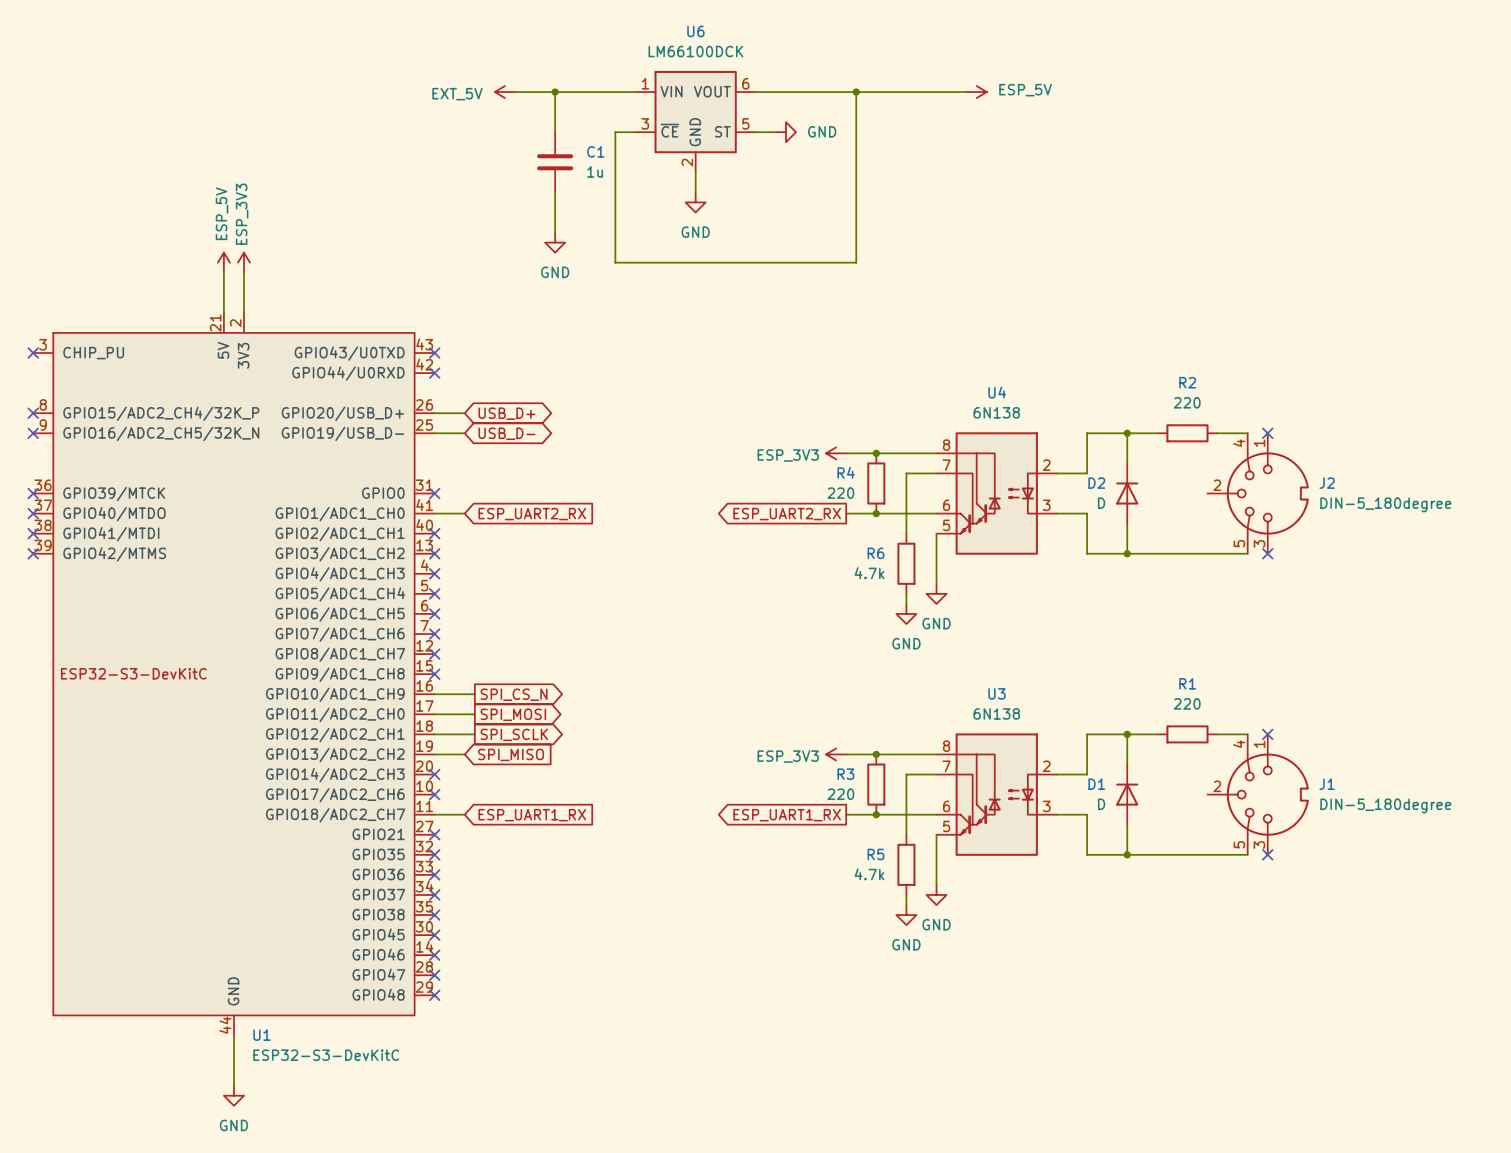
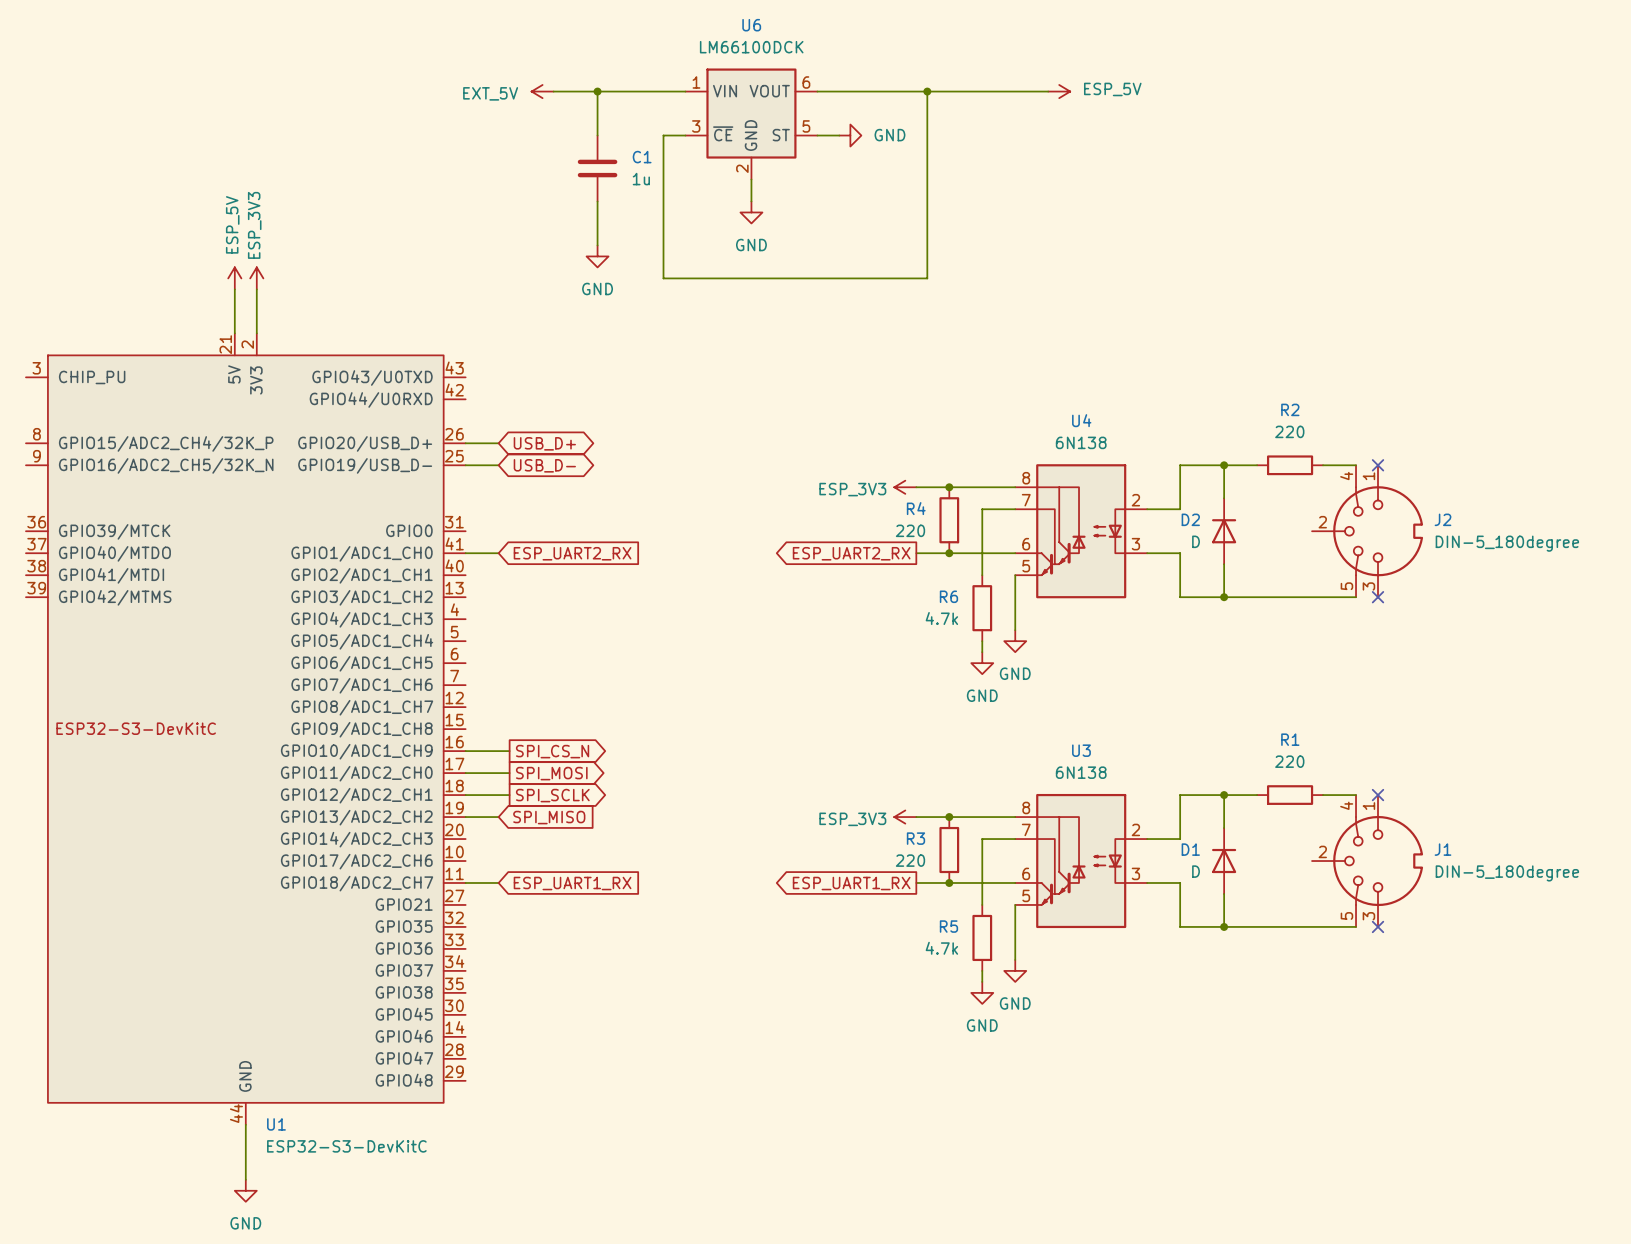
no-connect mark: (33, 352) -> none
no-connect mark: (434, 352) -> none
no-connect mark: (434, 373) -> none
no-connect mark: (33, 413) -> none
no-connect mark: (33, 433) -> none
no-connect mark: (33, 493) -> none
no-connect mark: (434, 493) -> none
no-connect mark: (33, 513) -> none
no-connect mark: (33, 533) -> none
no-connect mark: (434, 533) -> none
no-connect mark: (33, 553) -> none
no-connect mark: (434, 553) -> none
no-connect mark: (434, 573) -> none
no-connect mark: (434, 593) -> none
no-connect mark: (434, 613) -> none
no-connect mark: (434, 634) -> none
no-connect mark: (434, 654) -> none
no-connect mark: (434, 674) -> none
no-connect mark: (434, 774) -> none
no-connect mark: (434, 794) -> none
no-connect mark: (434, 834) -> none
no-connect mark: (434, 854) -> none
no-connect mark: (434, 874) -> none
no-connect mark: (434, 894) -> none
no-connect mark: (434, 915) -> none
no-connect mark: (434, 935) -> none
no-connect mark: (434, 955) -> none
no-connect mark: (434, 975) -> none
no-connect mark: (434, 995) -> none

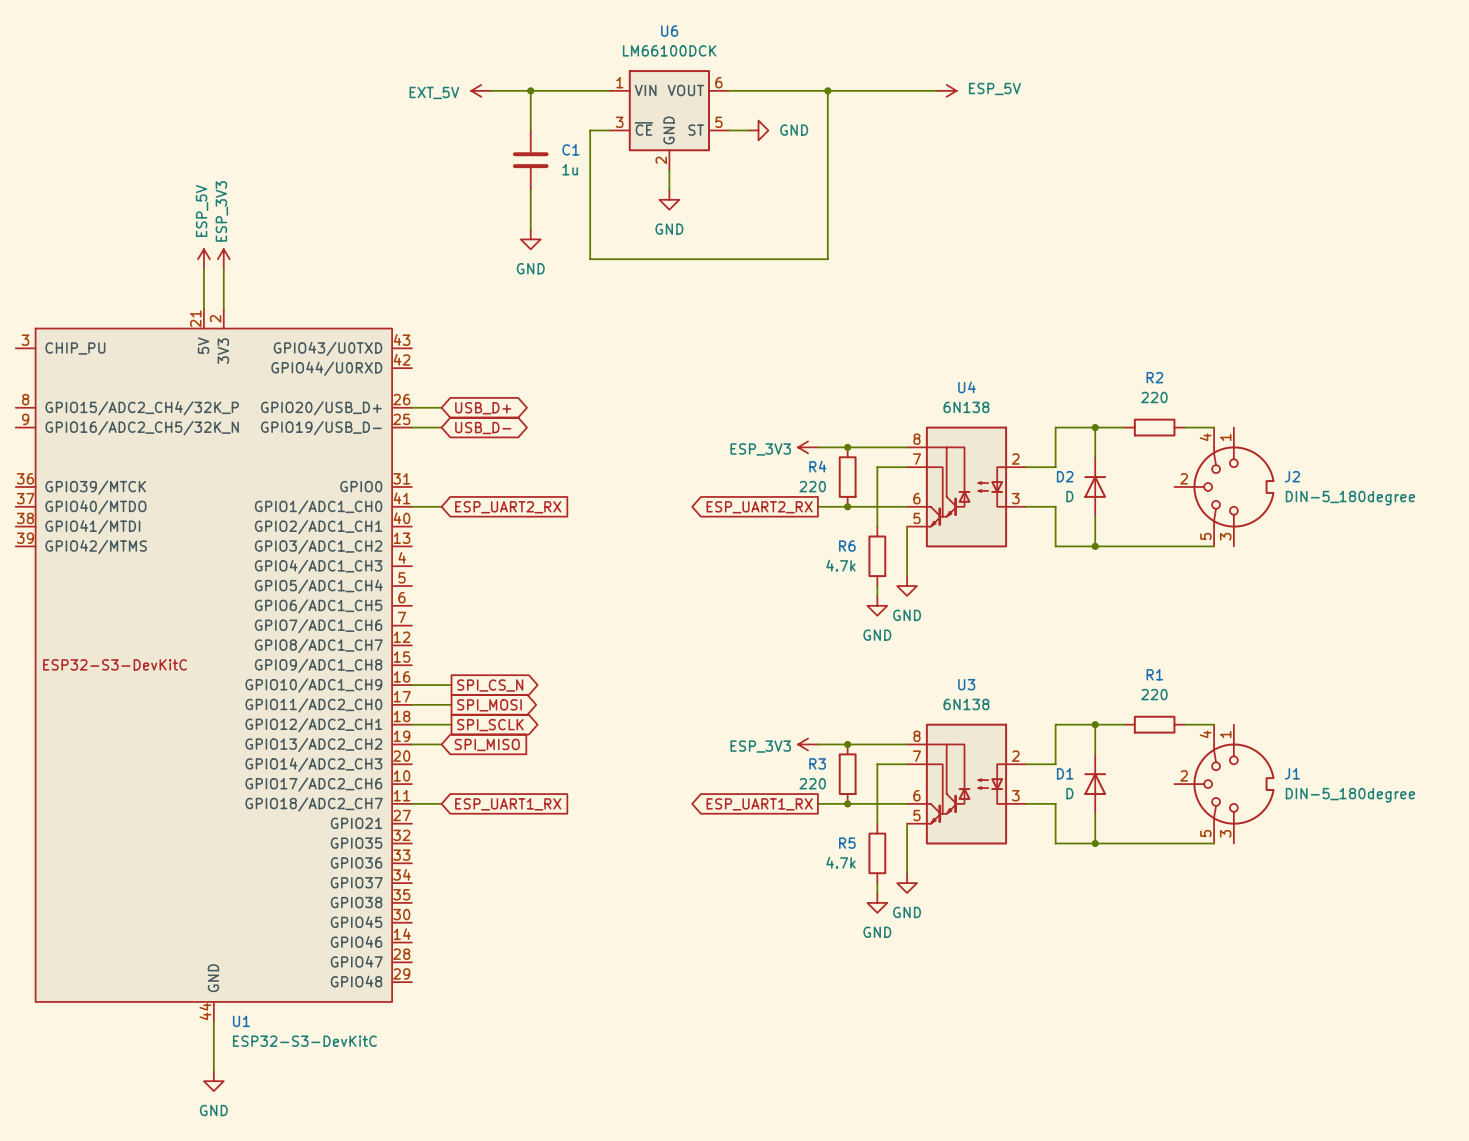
no-connect mark: (1378, 465) -> none
no-connect mark: (1378, 597) -> none
no-connect mark: (1378, 795) -> none
no-connect mark: (1378, 926) -> none

